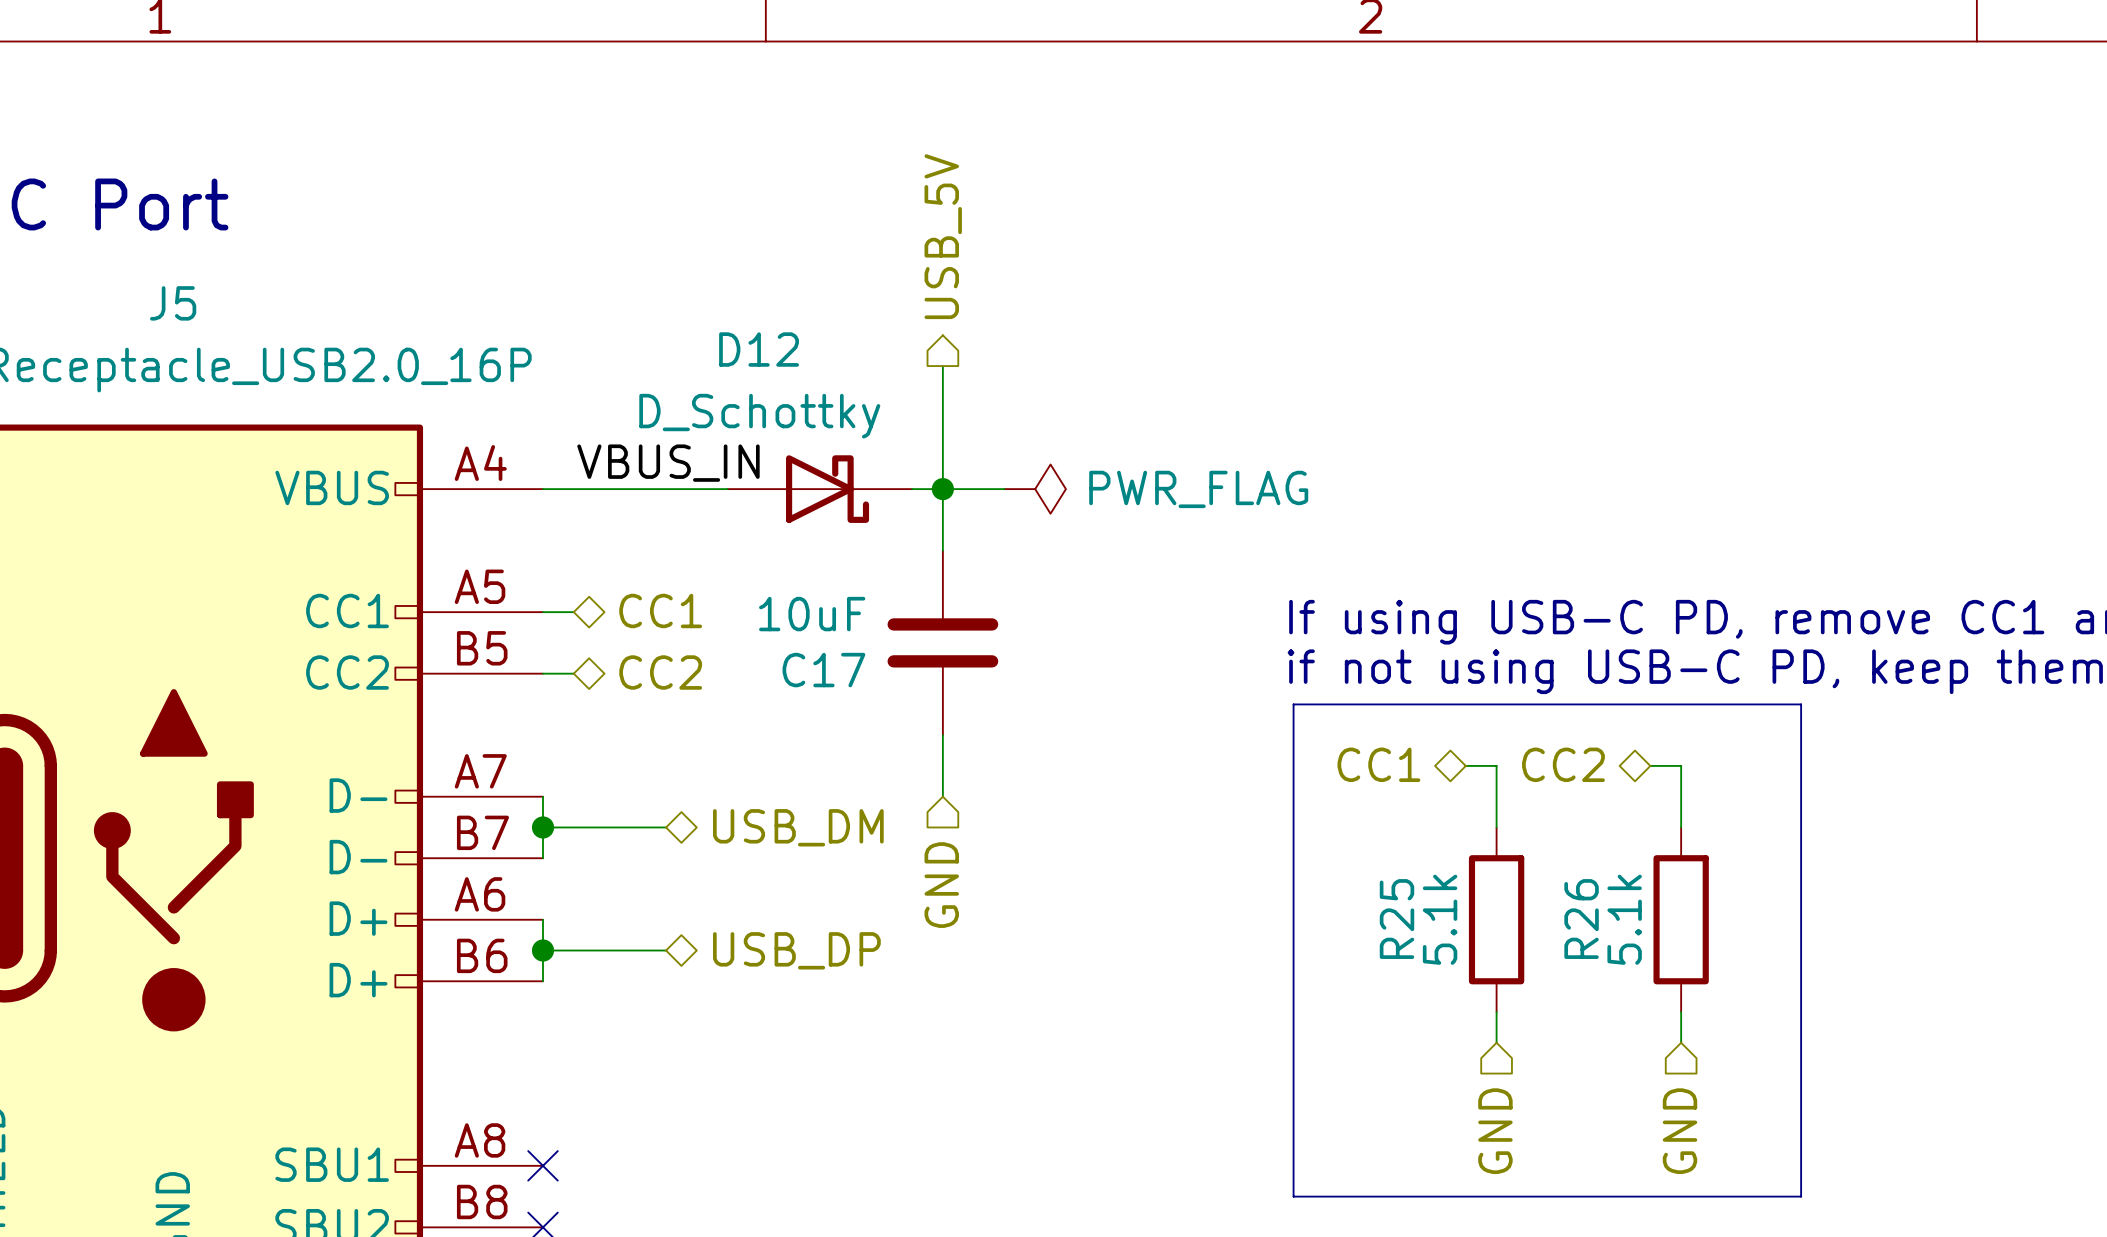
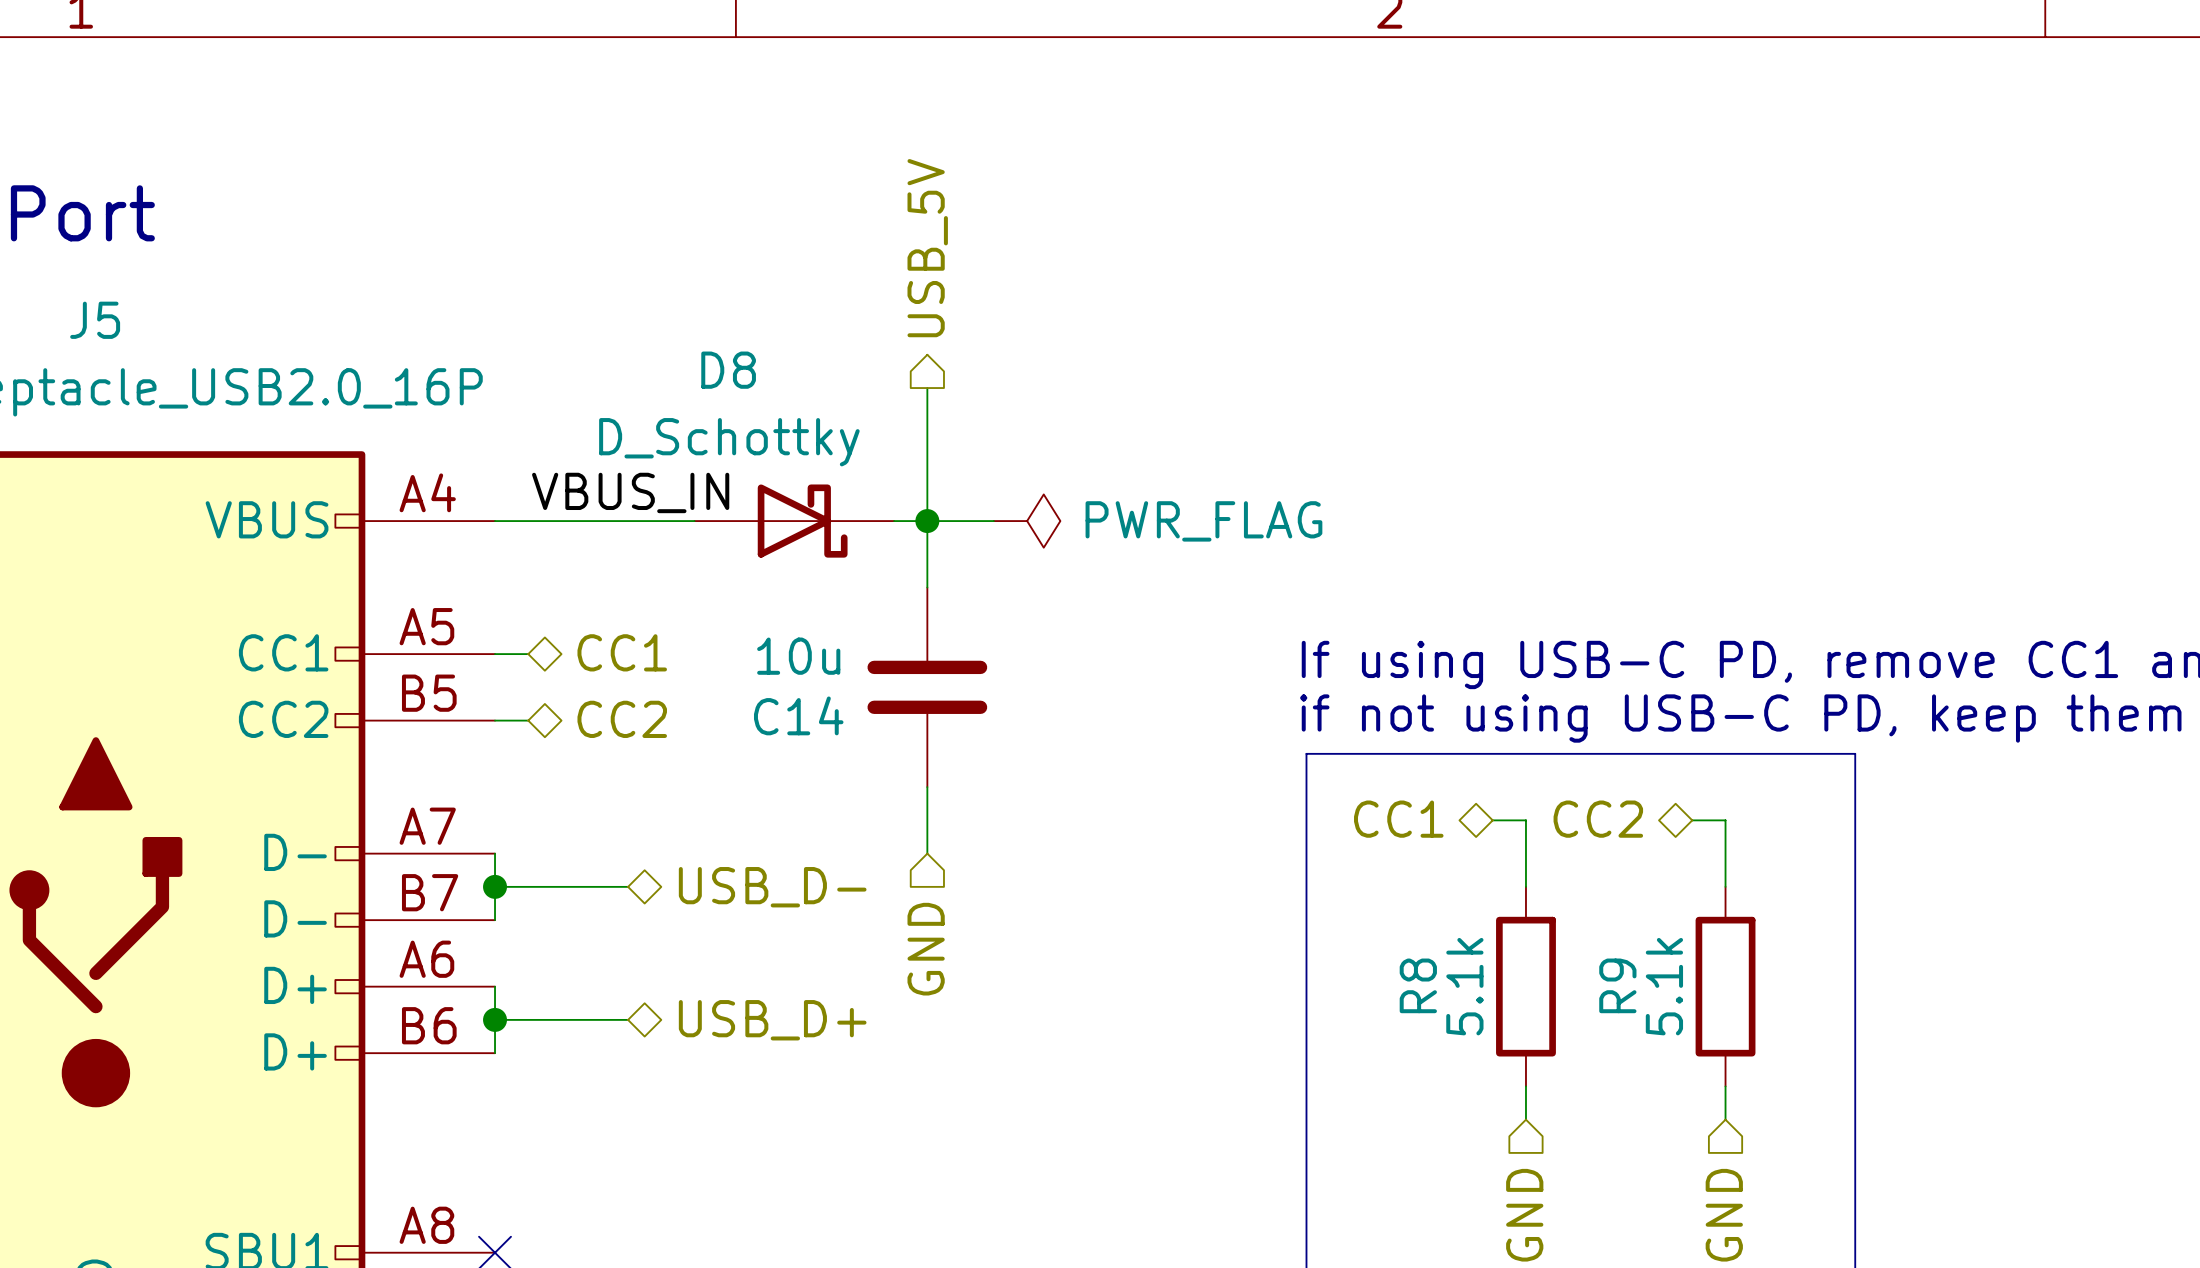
D12 name: D12 (759, 349) -> D8 (728, 370)
C17 value: 10uF (812, 614) -> 10u (798, 656)
C17 name: C17 (823, 670) -> C14 (798, 715)
hierarchical label: USB_DM (798, 827) -> USB_D- (772, 887)
R25 name: R25 (1397, 919) -> R8 (1418, 985)
R26 name: R26 (1581, 919) -> R9 (1617, 985)
hierarchical label: USB_DP (796, 950) -> USB_D+ (772, 1020)

